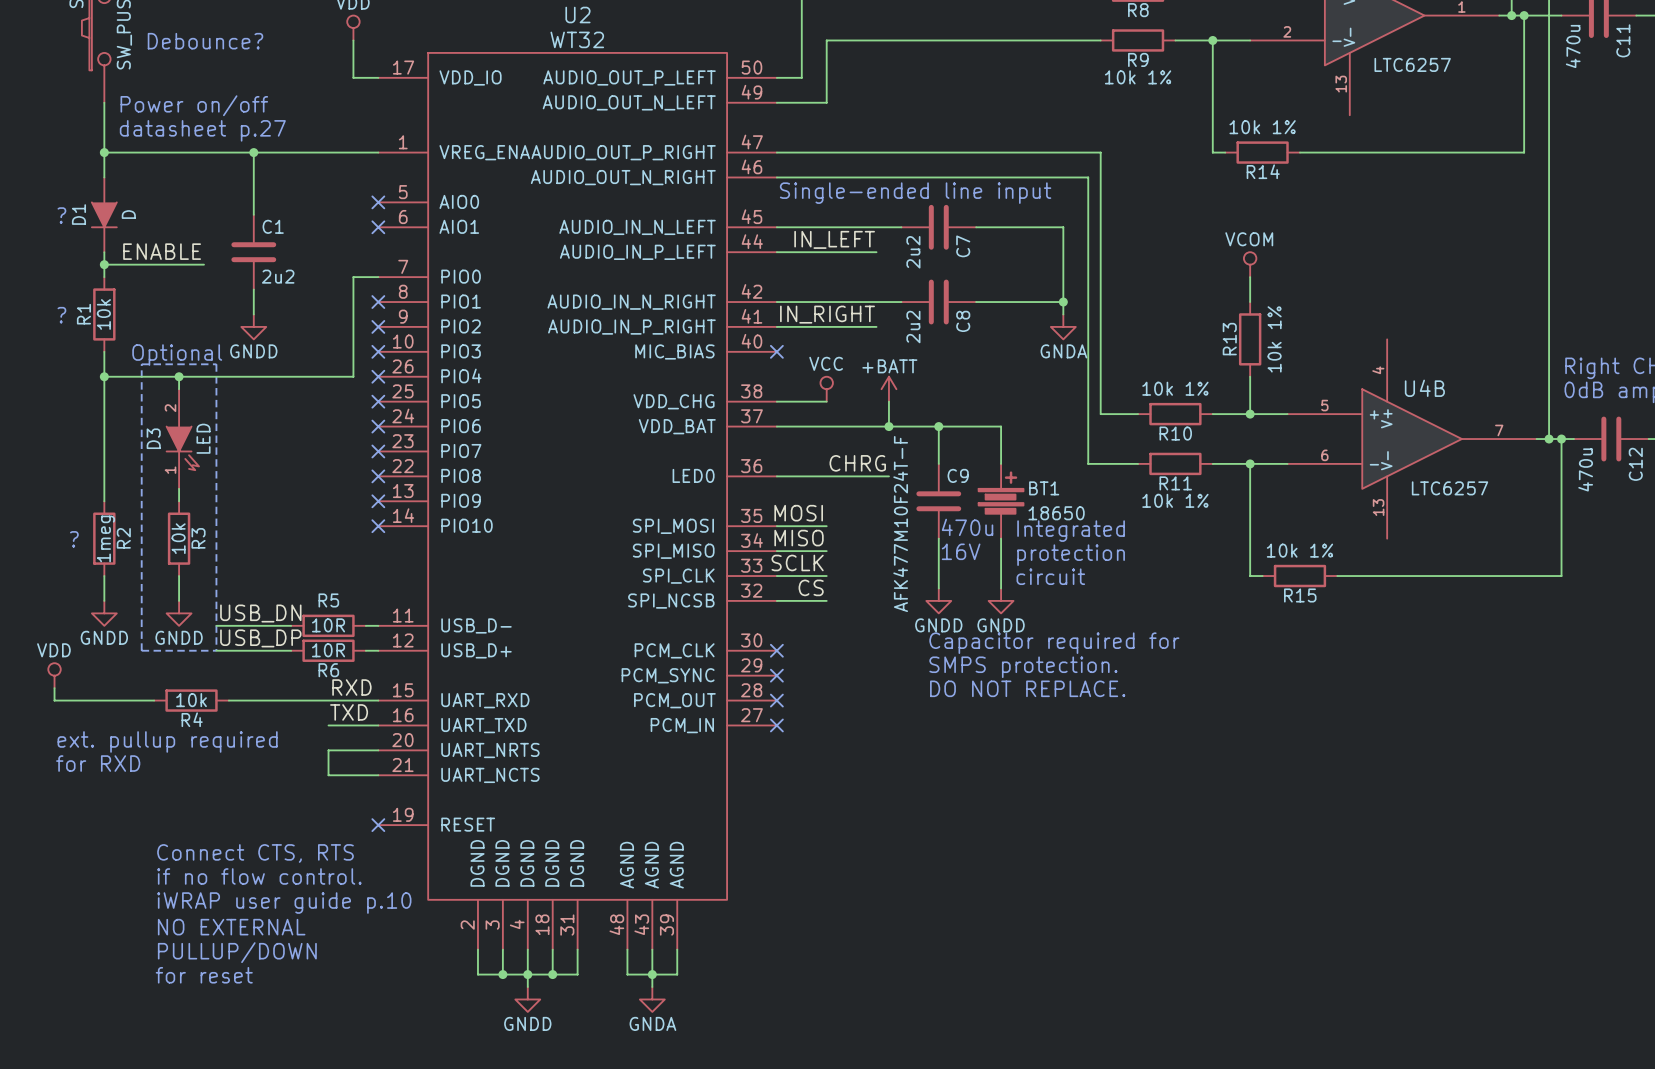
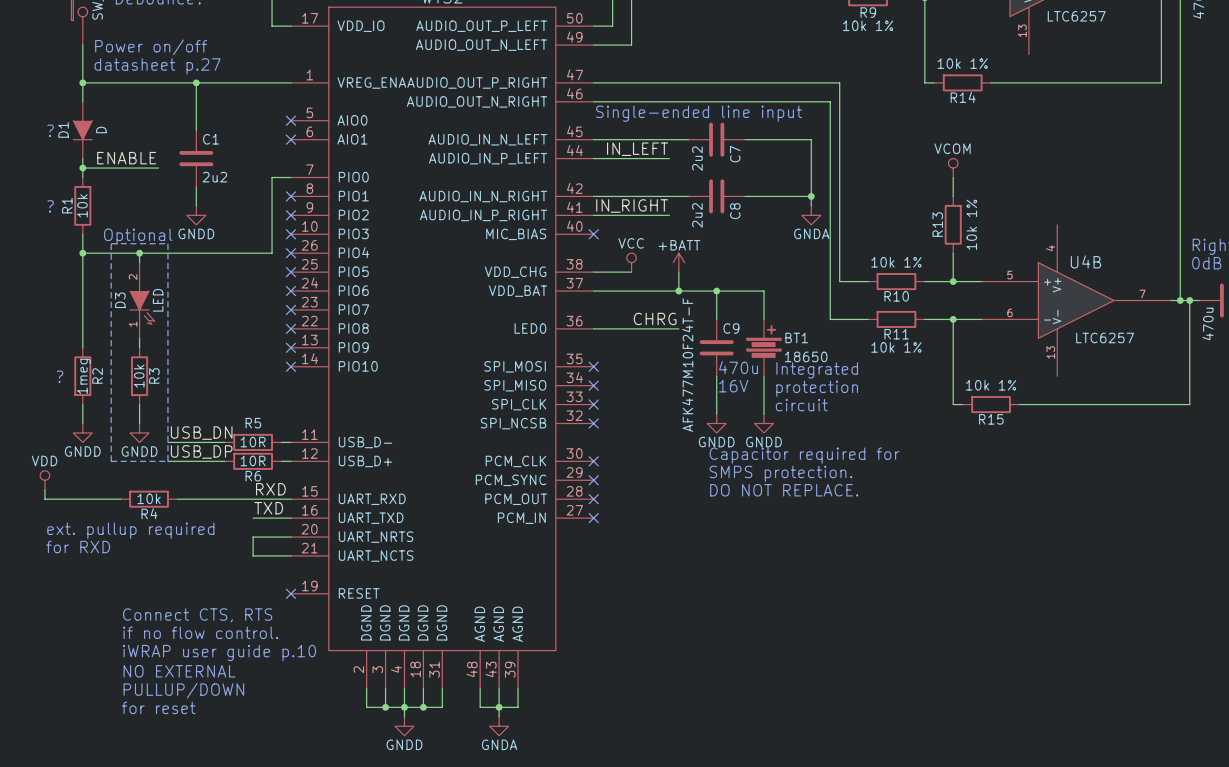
label: MOSI (798, 513) -> none
wire: (776, 526) (826, 526) -> none
no-connect mark: none -> (593, 366)
label: MISO (799, 538) -> none
wire: (776, 551) (826, 551) -> none
no-connect mark: none -> (593, 385)
label: SCLK (797, 562) -> none
wire: (776, 576) (826, 576) -> none
no-connect mark: none -> (593, 404)
label: CS (811, 587) -> none
wire: (776, 600) (826, 600) -> none
no-connect mark: none -> (593, 423)

